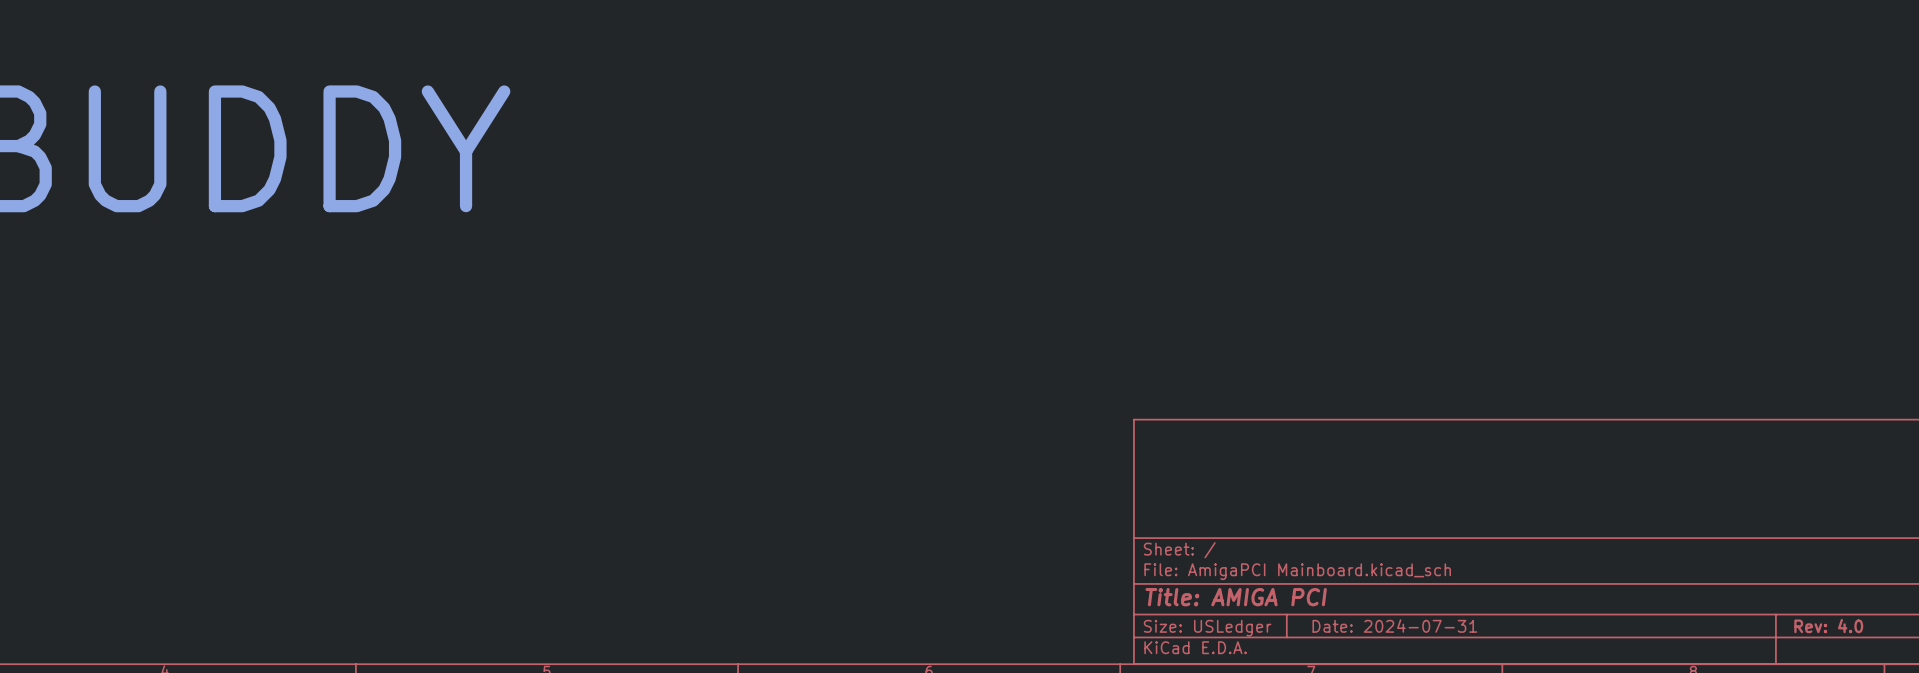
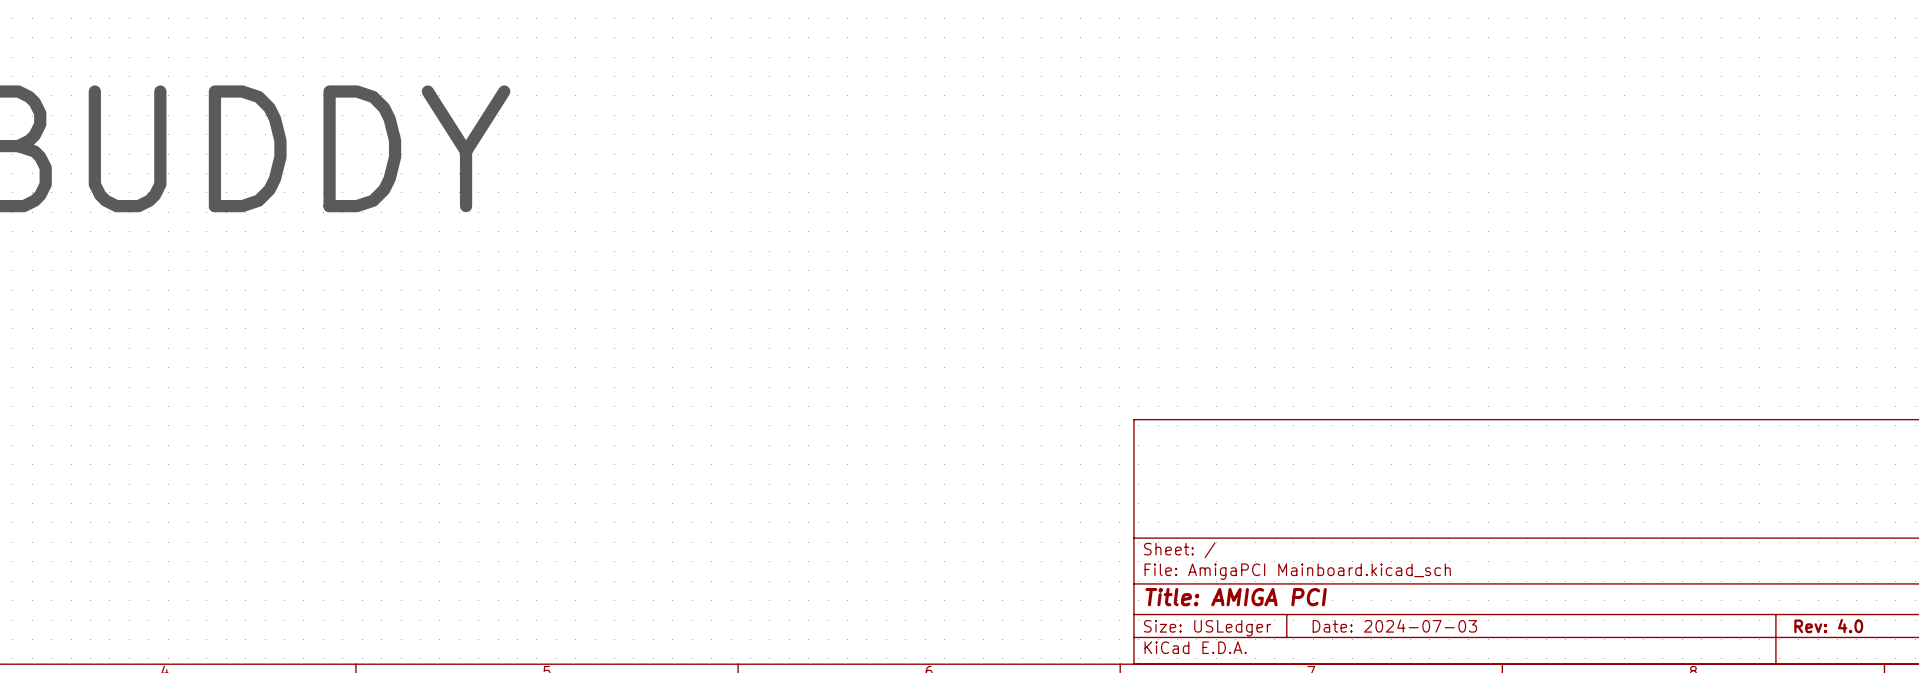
title block: Date: 2024-07-31 (1394, 626) -> Date: 2024-07-03 (1394, 626)

